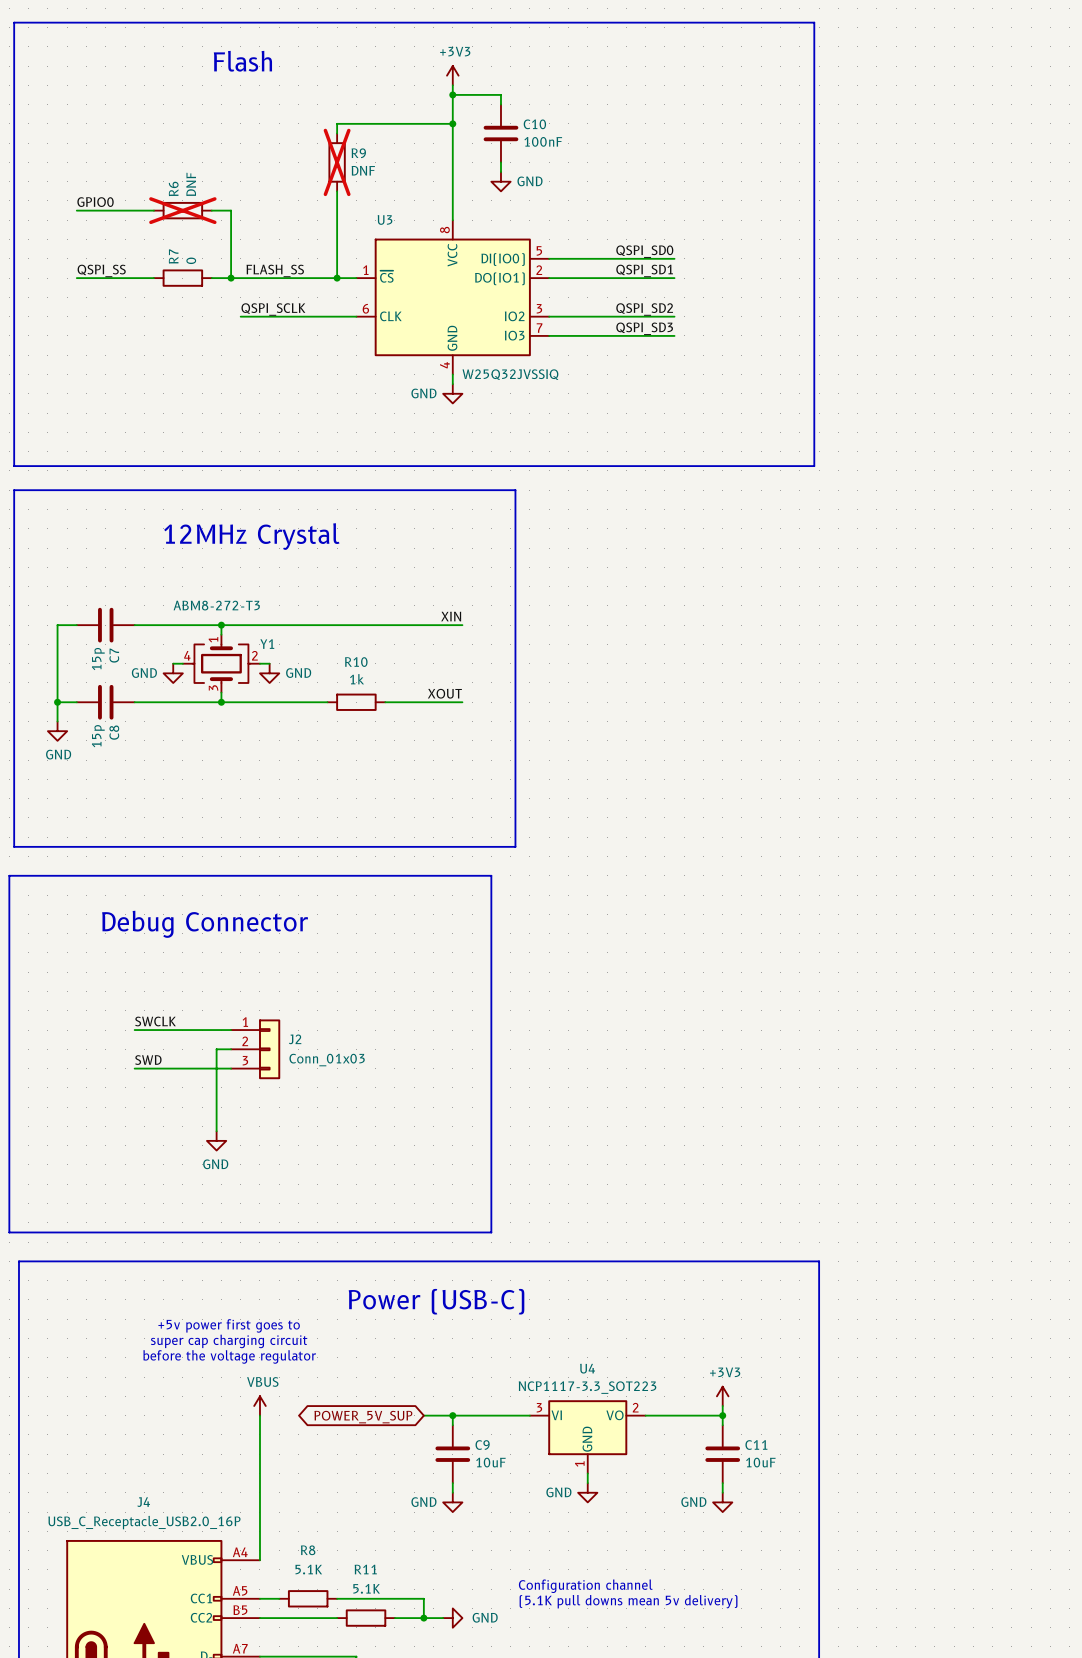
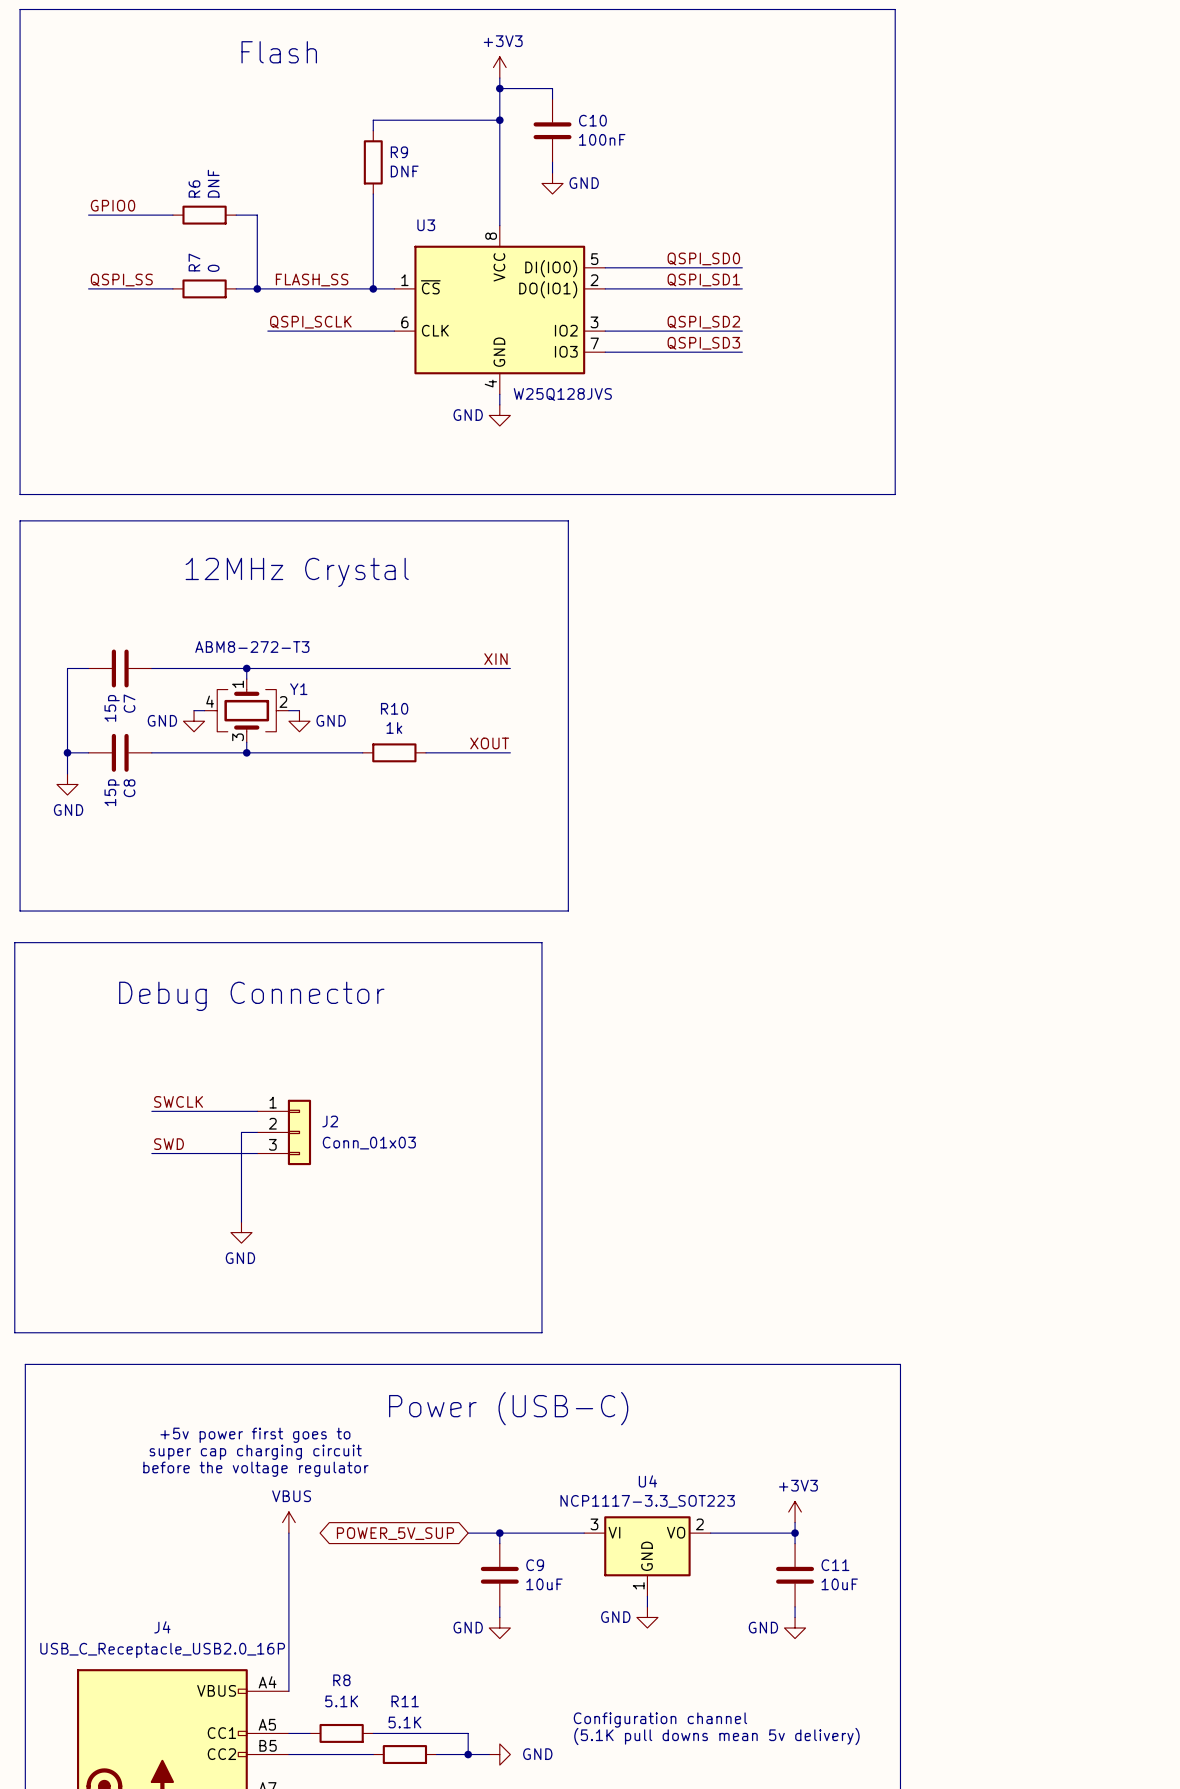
R9 do-not-place cross: (337, 162) -> none
R6 do-not-place cross: (182, 210) -> none
U3 value: W25Q32JVSSIQ (510, 374) -> W25Q128JVS (562, 394)

